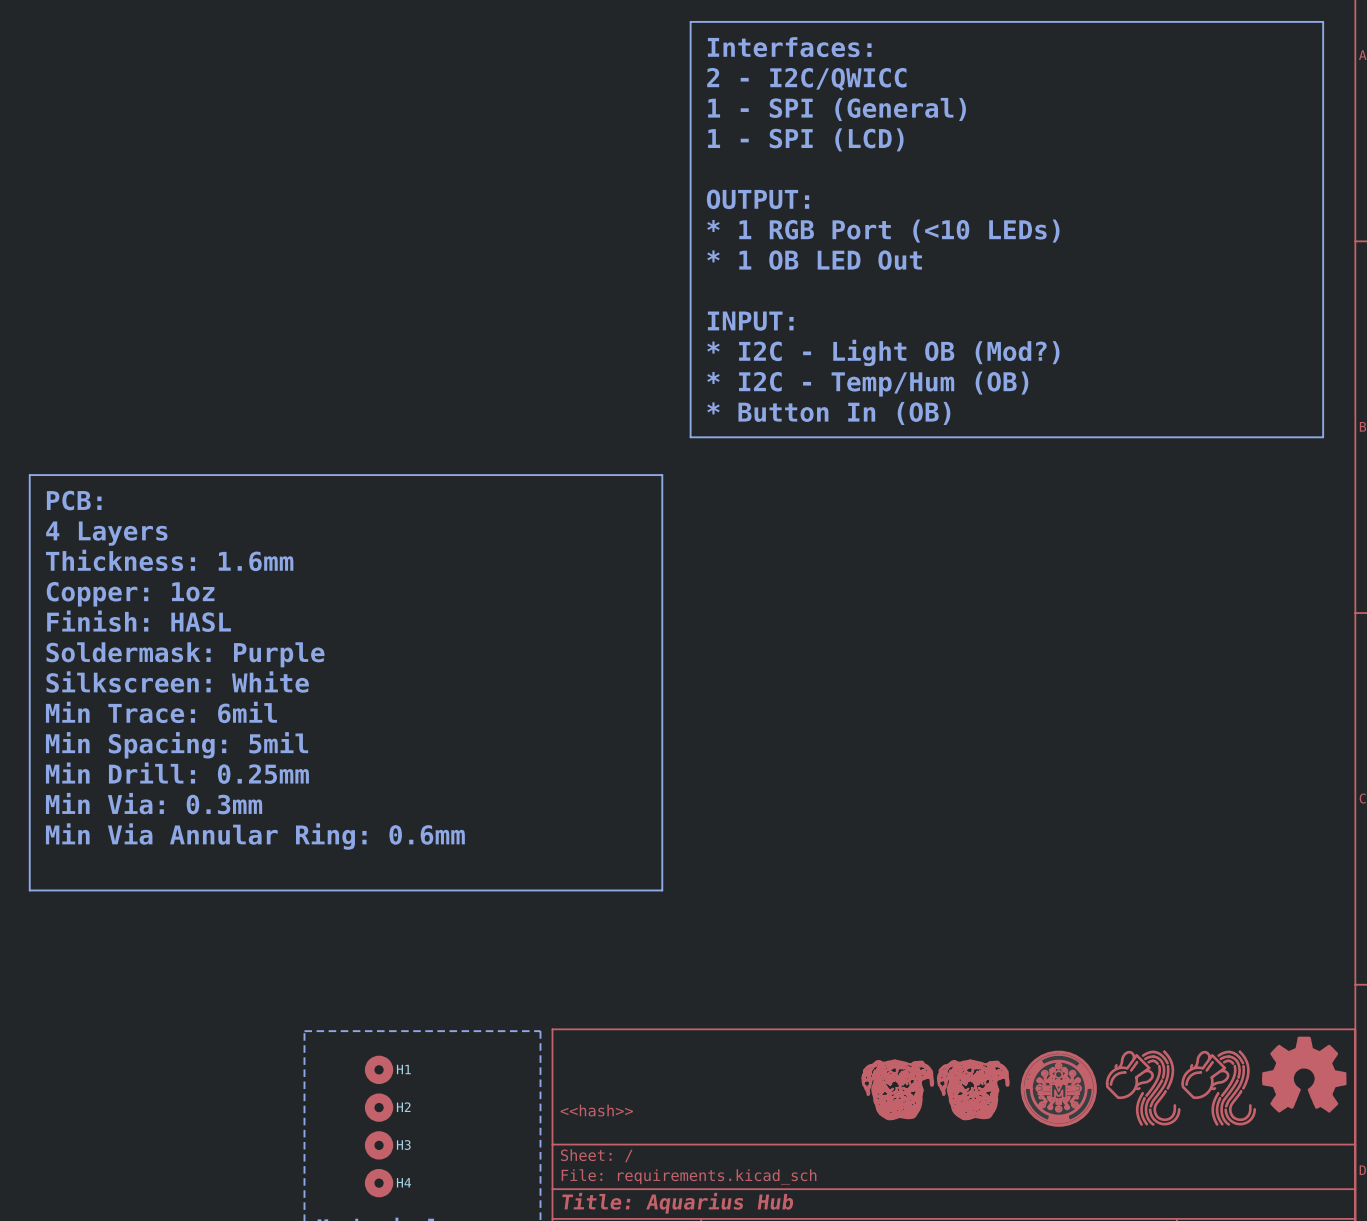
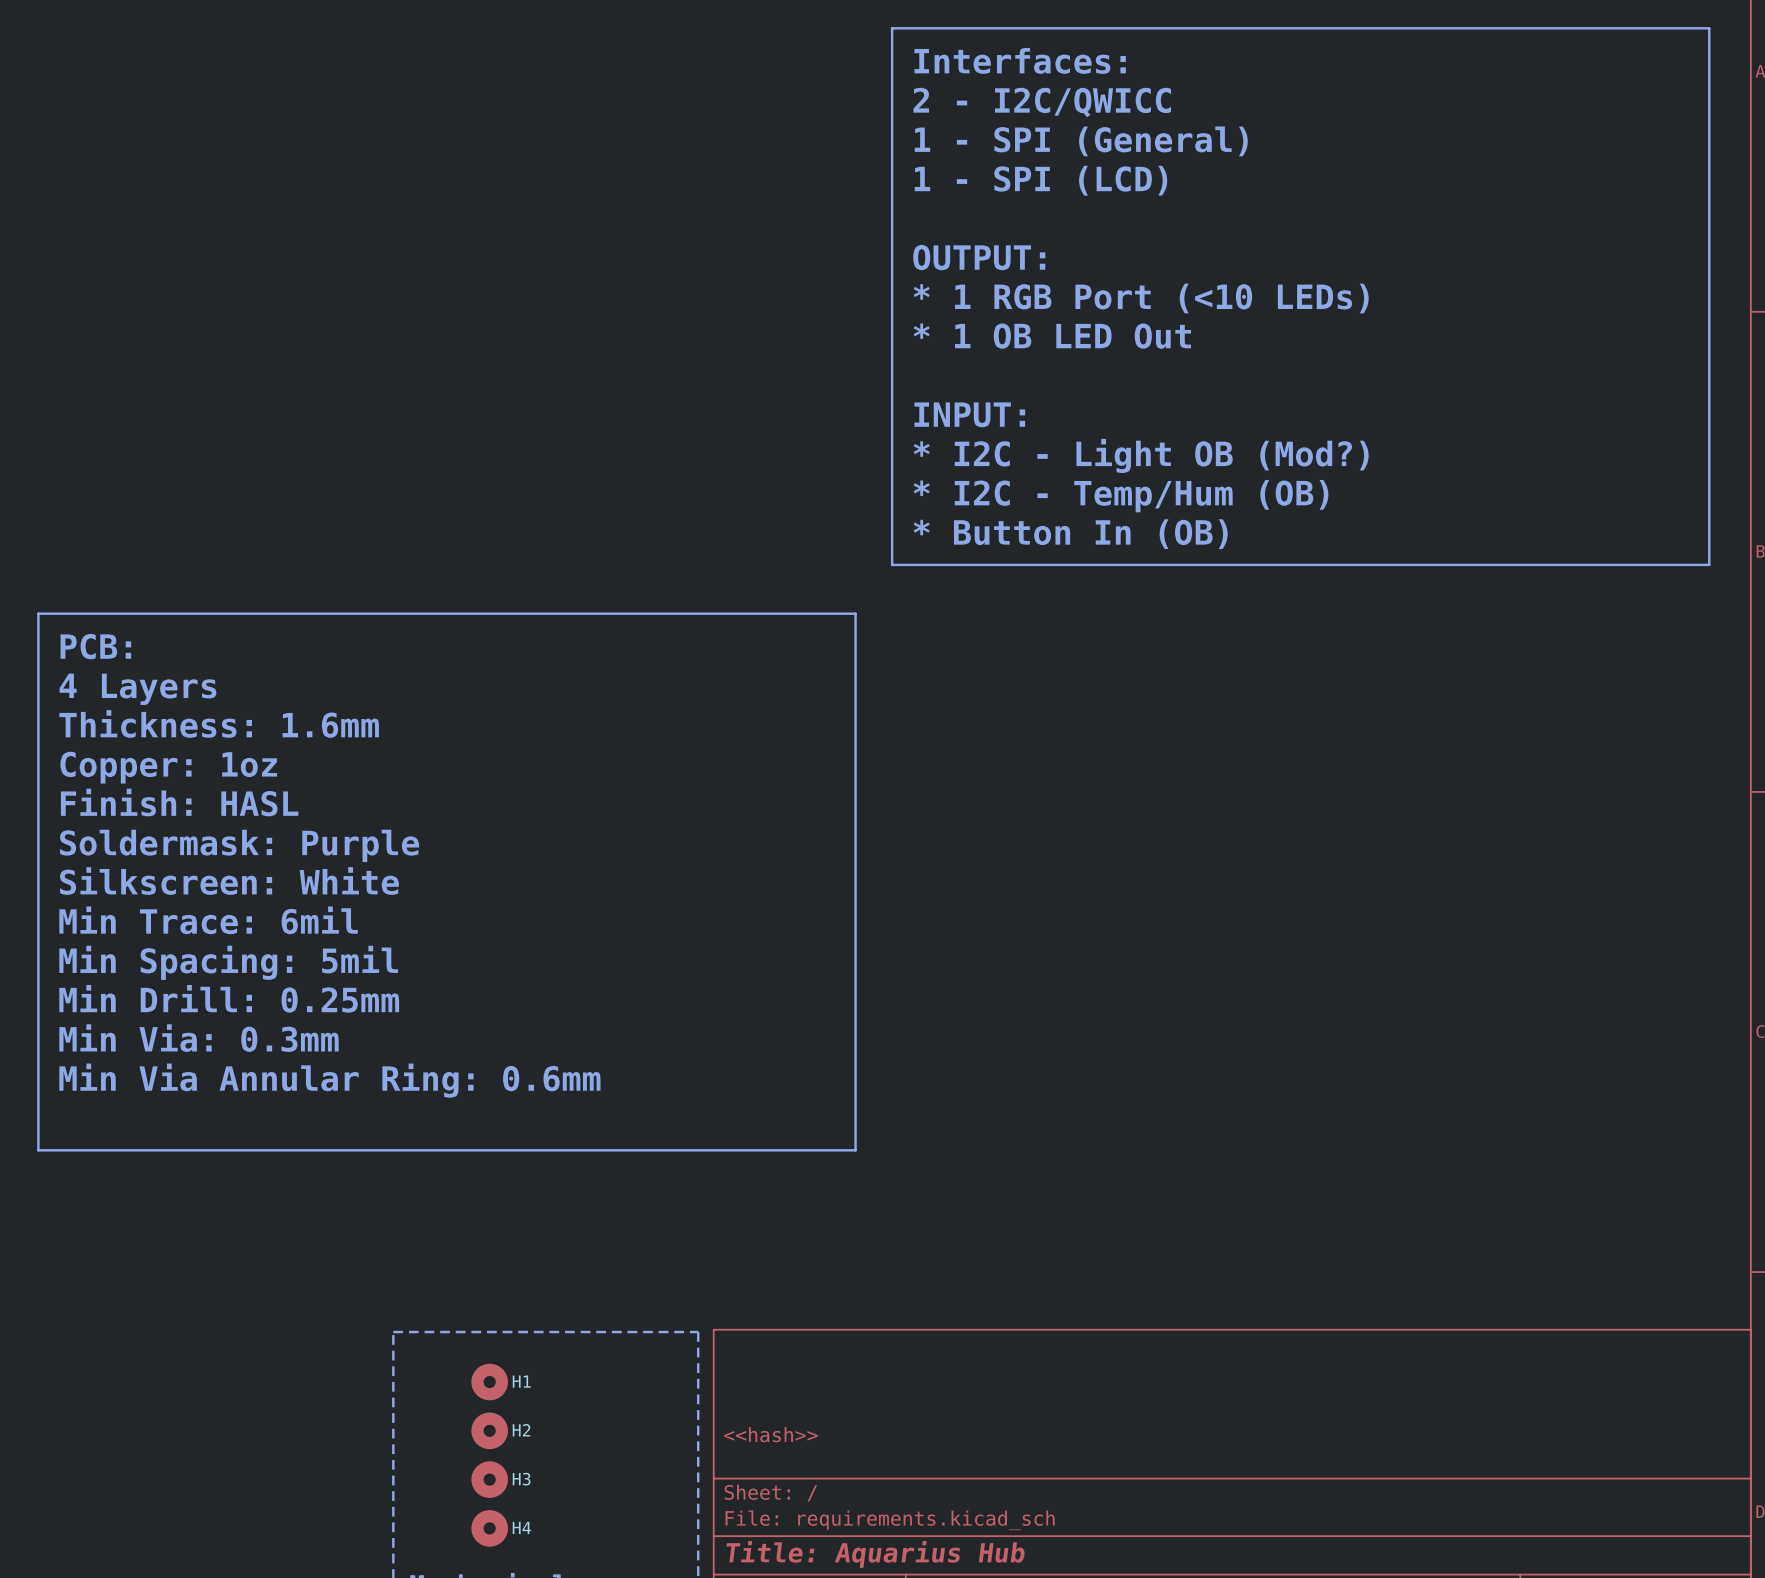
part: (1304, 1074) -> none
part: (1058, 1088) -> none
part: (1143, 1088) -> none
part: (1218, 1088) -> none
part: (897, 1089) -> none
part: (973, 1089) -> none

